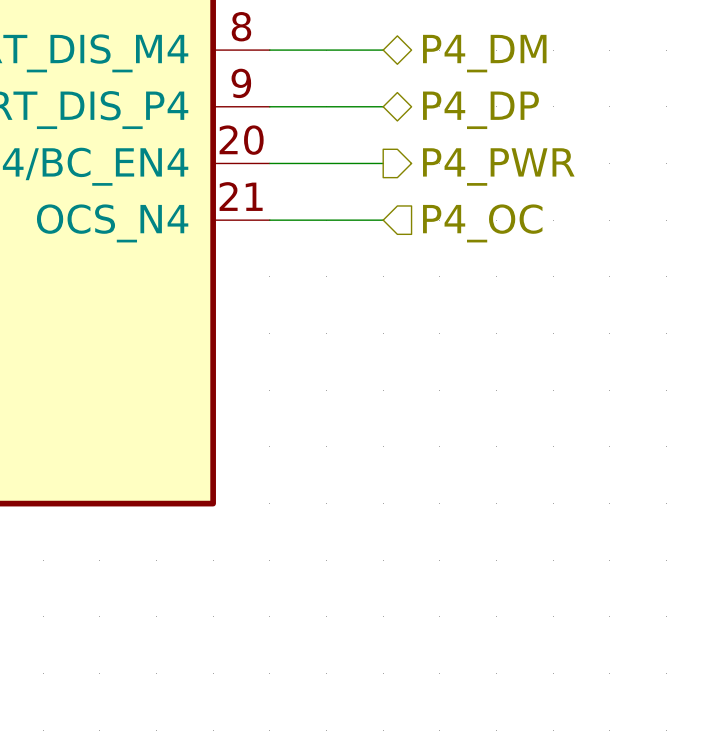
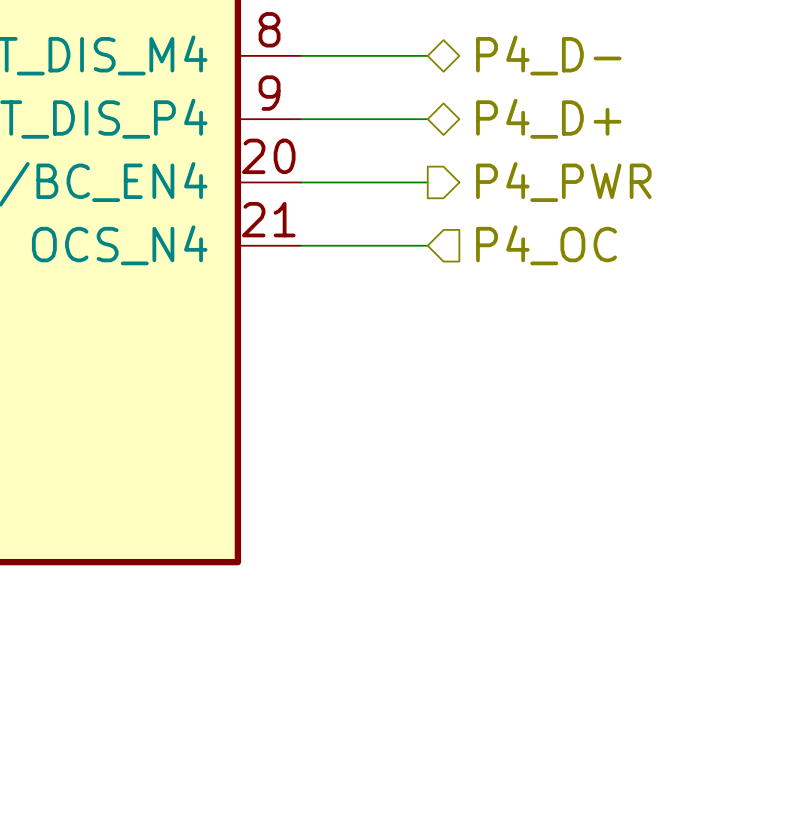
hierarchical label: P4_DM (484, 53) -> P4_D- (548, 55)
hierarchical label: P4_DP (480, 110) -> P4_D+ (548, 118)

